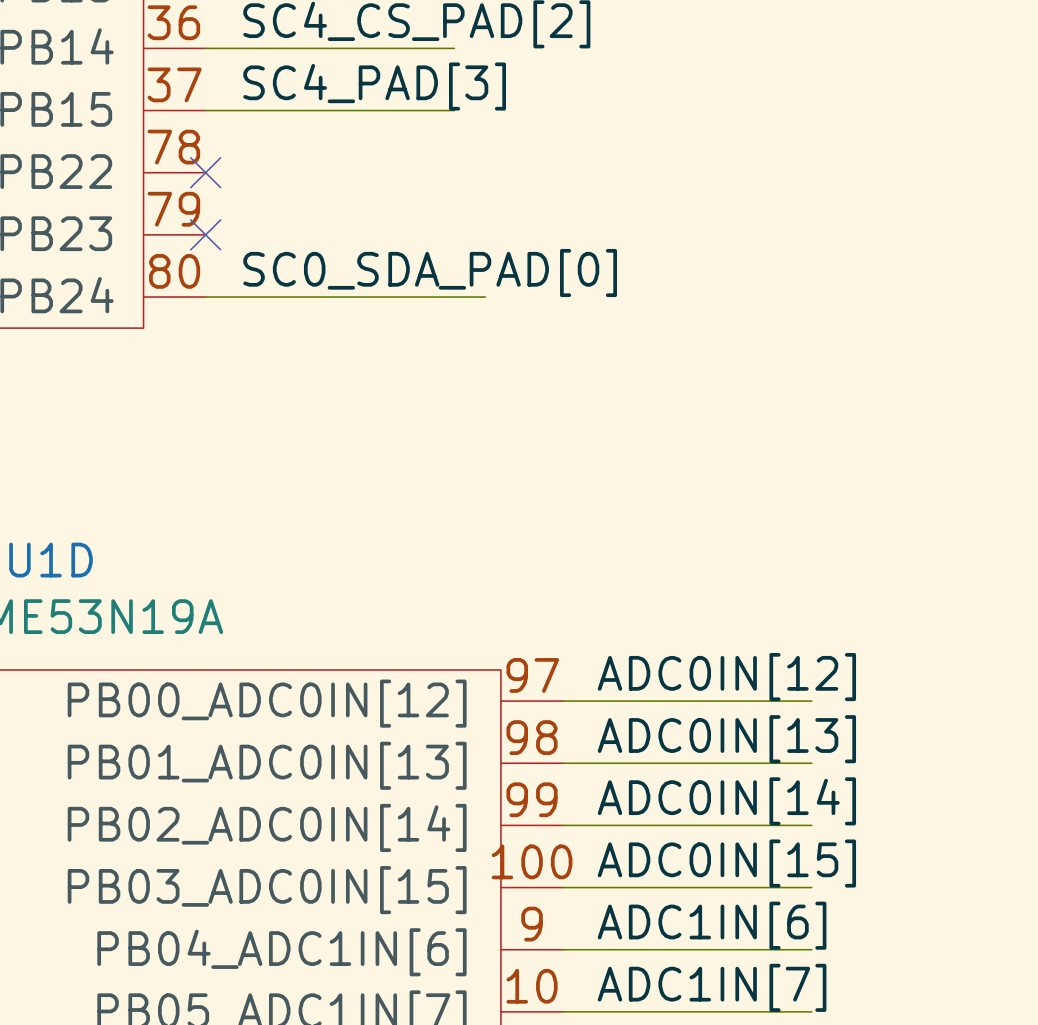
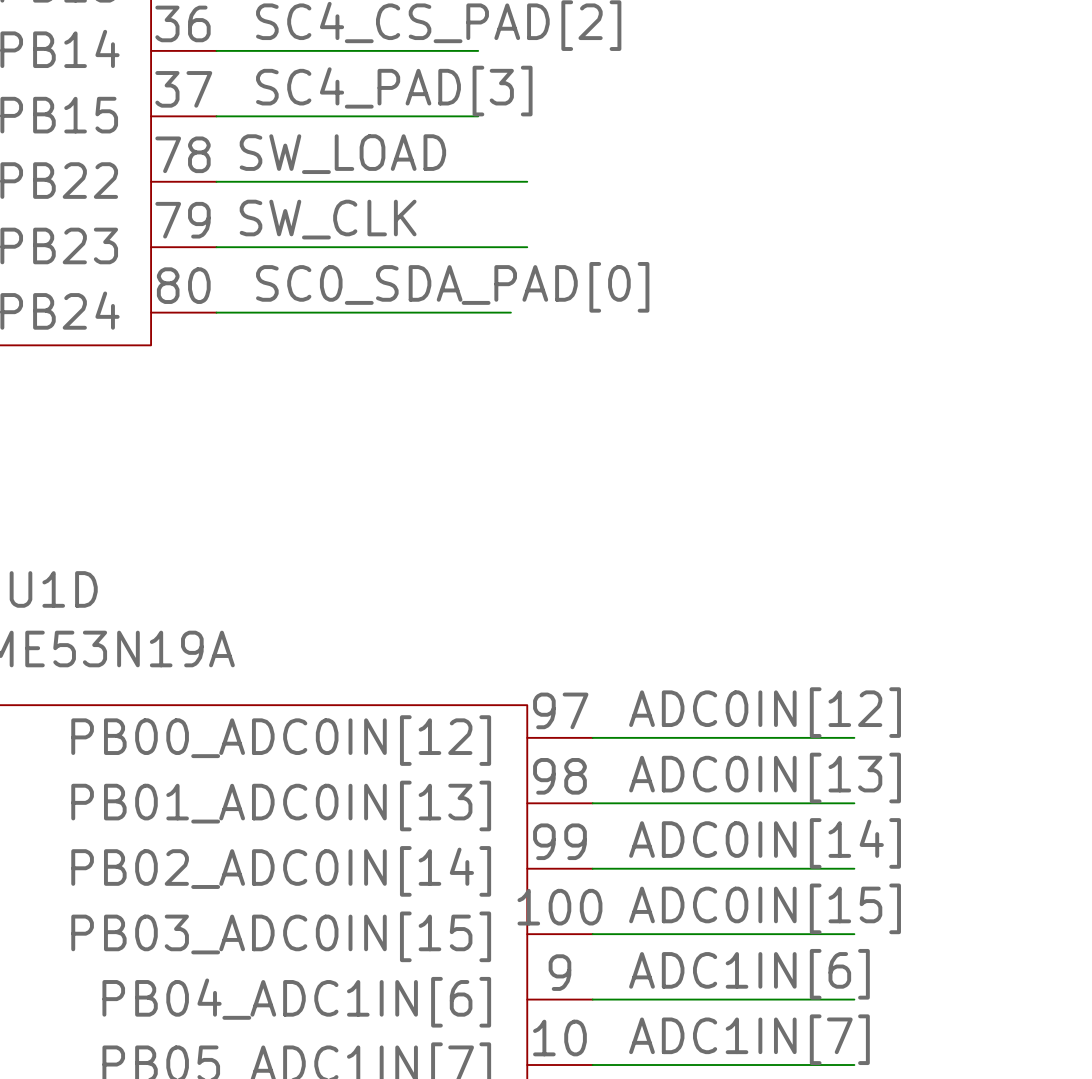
label: none -> SW_LOAD (342, 154)
wire: none -> (216, 181) (527, 181)
no-connect mark: (205, 172) -> none
label: none -> SW_CLK (328, 219)
wire: none -> (216, 247) (527, 247)
no-connect mark: (205, 234) -> none

